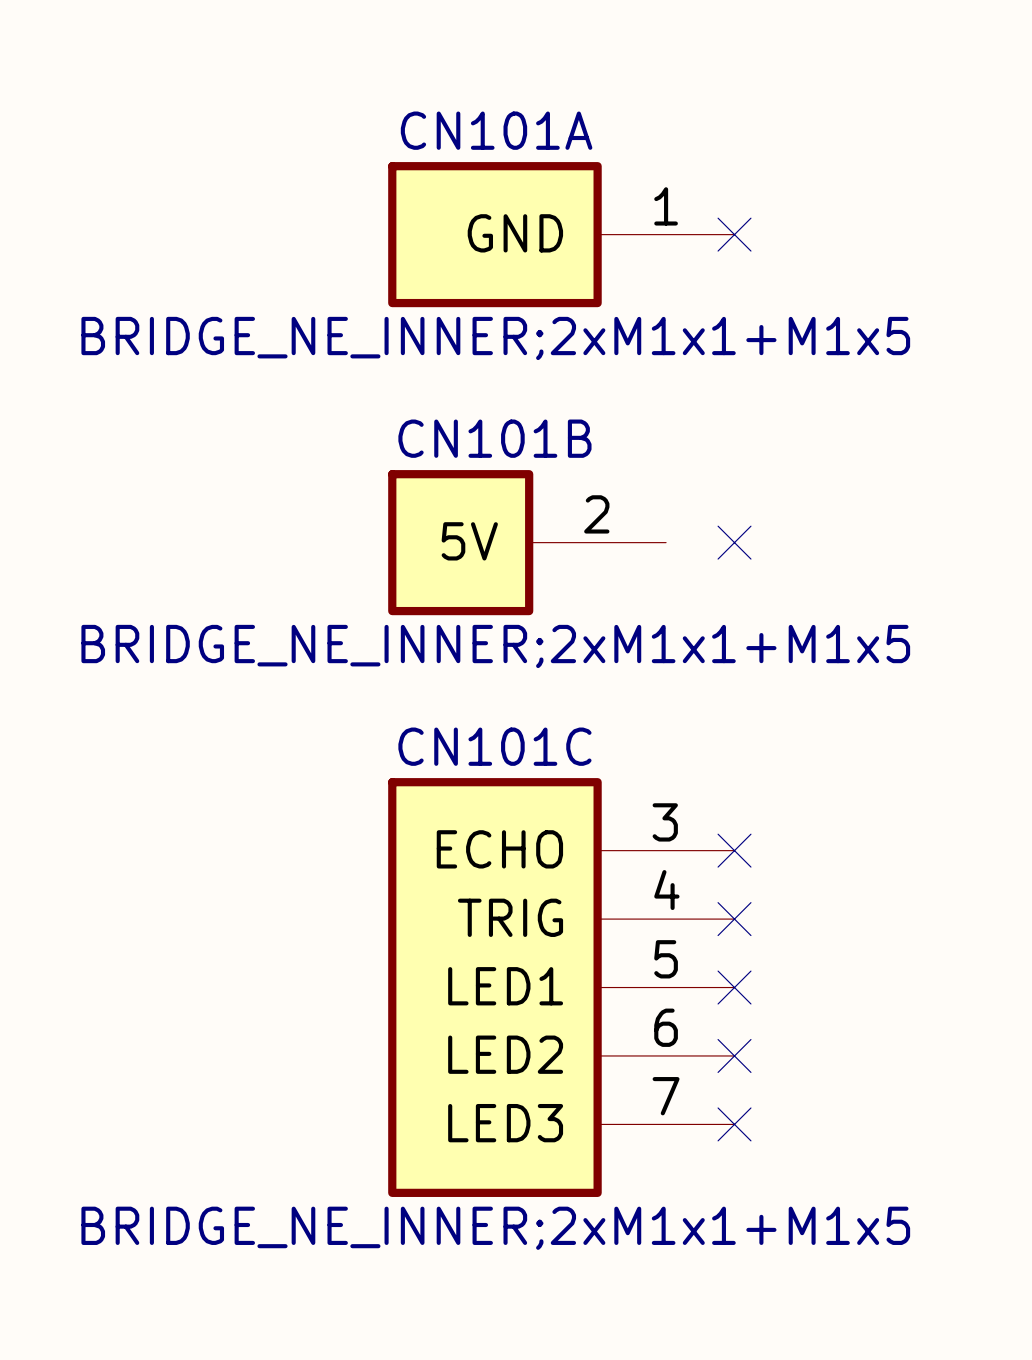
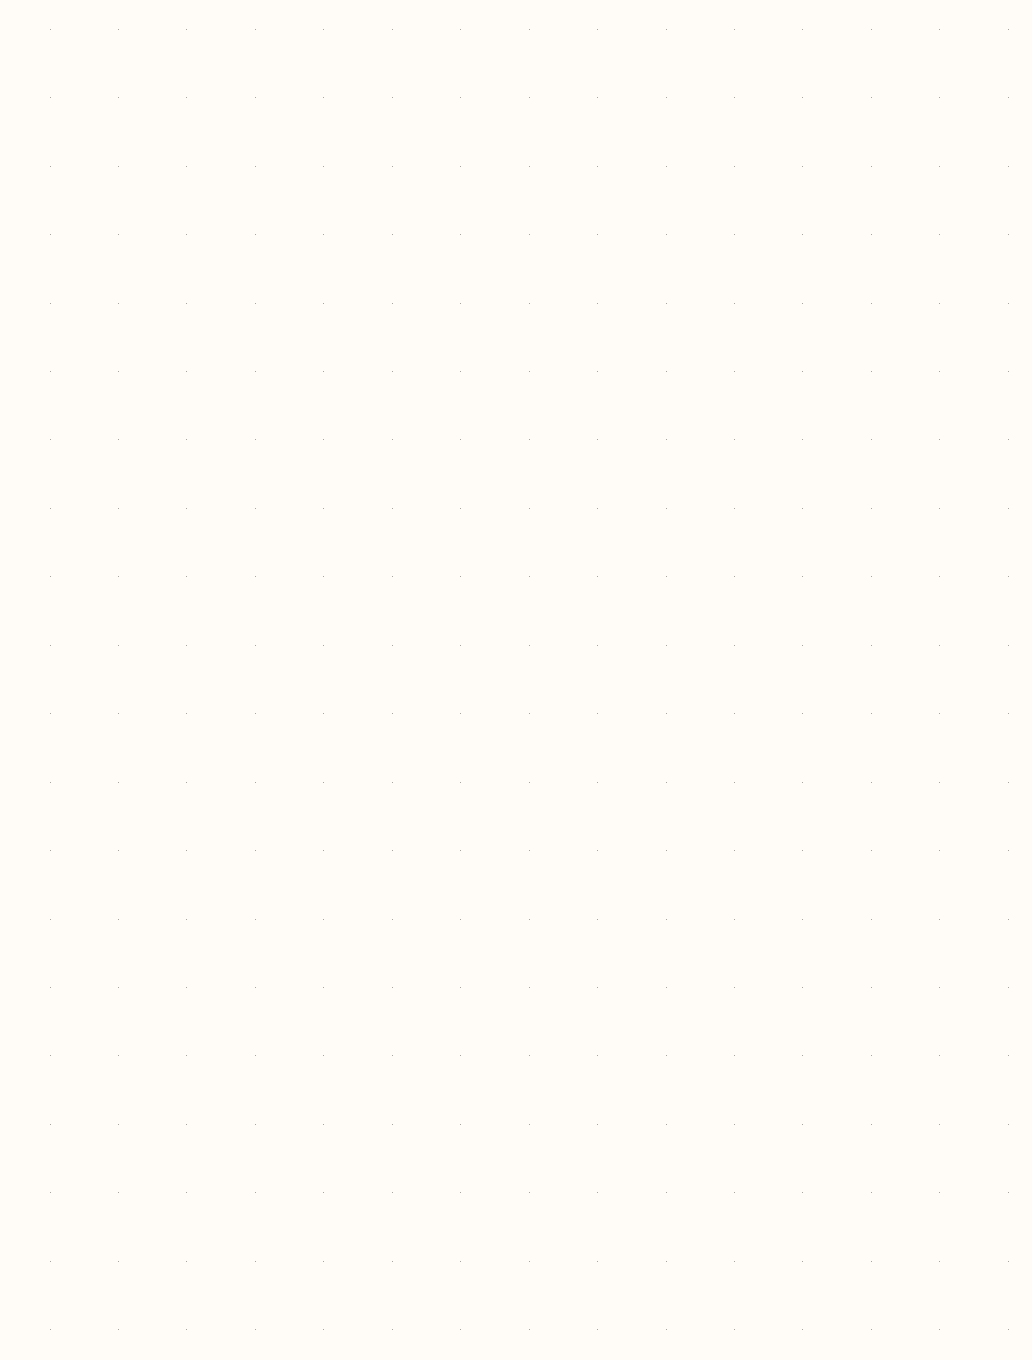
CN101A: BRIDGE_NE_INNER;2xM1x1+M1x5 (561, 234) -> none
no-connect mark: (734, 234) -> none
CN101B: BRIDGE_NE_INNER;2xM1x1+M1x5 (527, 542) -> none
no-connect mark: (734, 542) -> none
no-connect mark: (734, 850) -> none
no-connect mark: (734, 919) -> none
CN101C: BRIDGE_NE_INNER;2xM1x1+M1x5 (561, 987) -> none
no-connect mark: (734, 987) -> none
no-connect mark: (734, 1055) -> none
no-connect mark: (734, 1124) -> none

